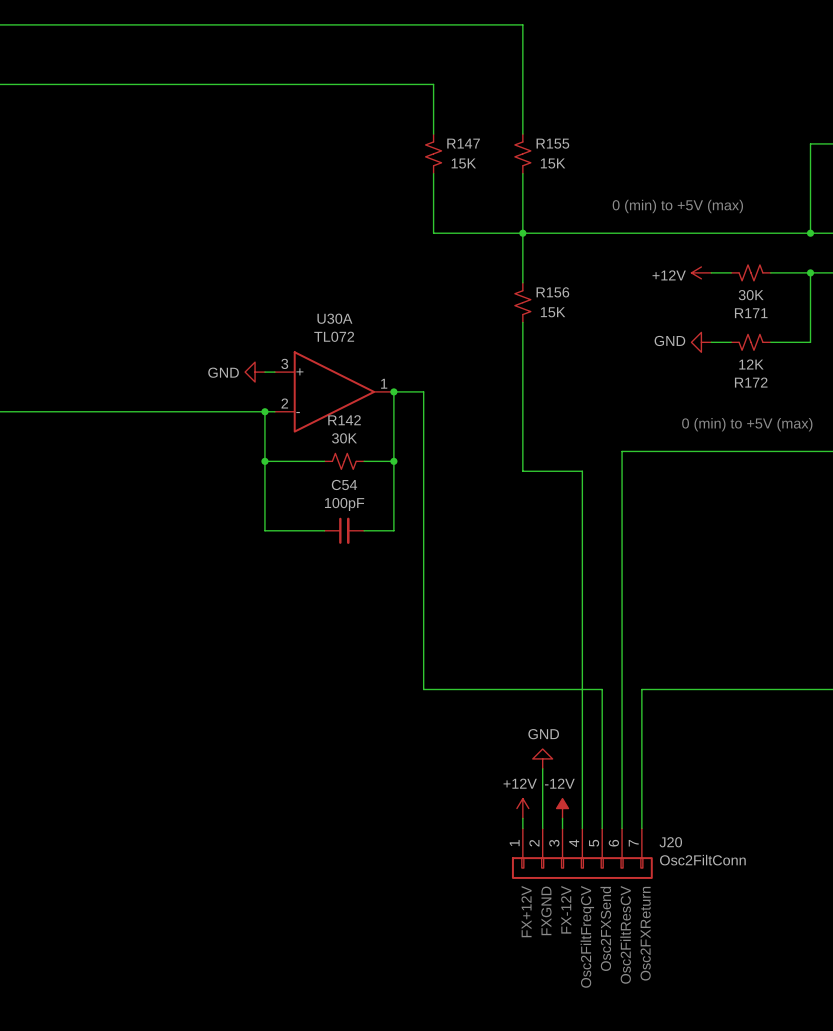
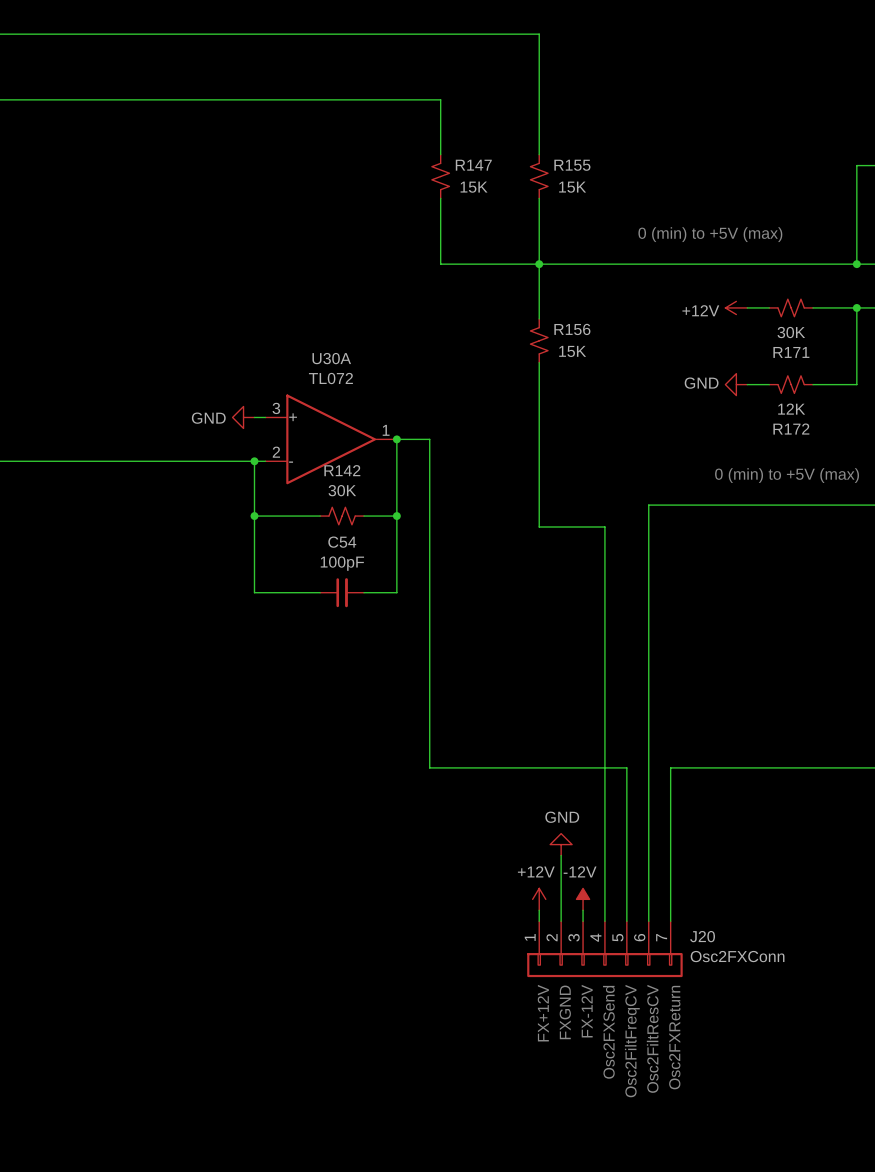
J20 value: Osc2FiltConn (702, 860) -> Osc2FXConn (737, 956)
text: Osc2FXSend (605, 928) -> Osc2FiltFreqCV (632, 1041)
text: Osc2FiltFreqCV (587, 936) -> Osc2FXSend (608, 1032)

